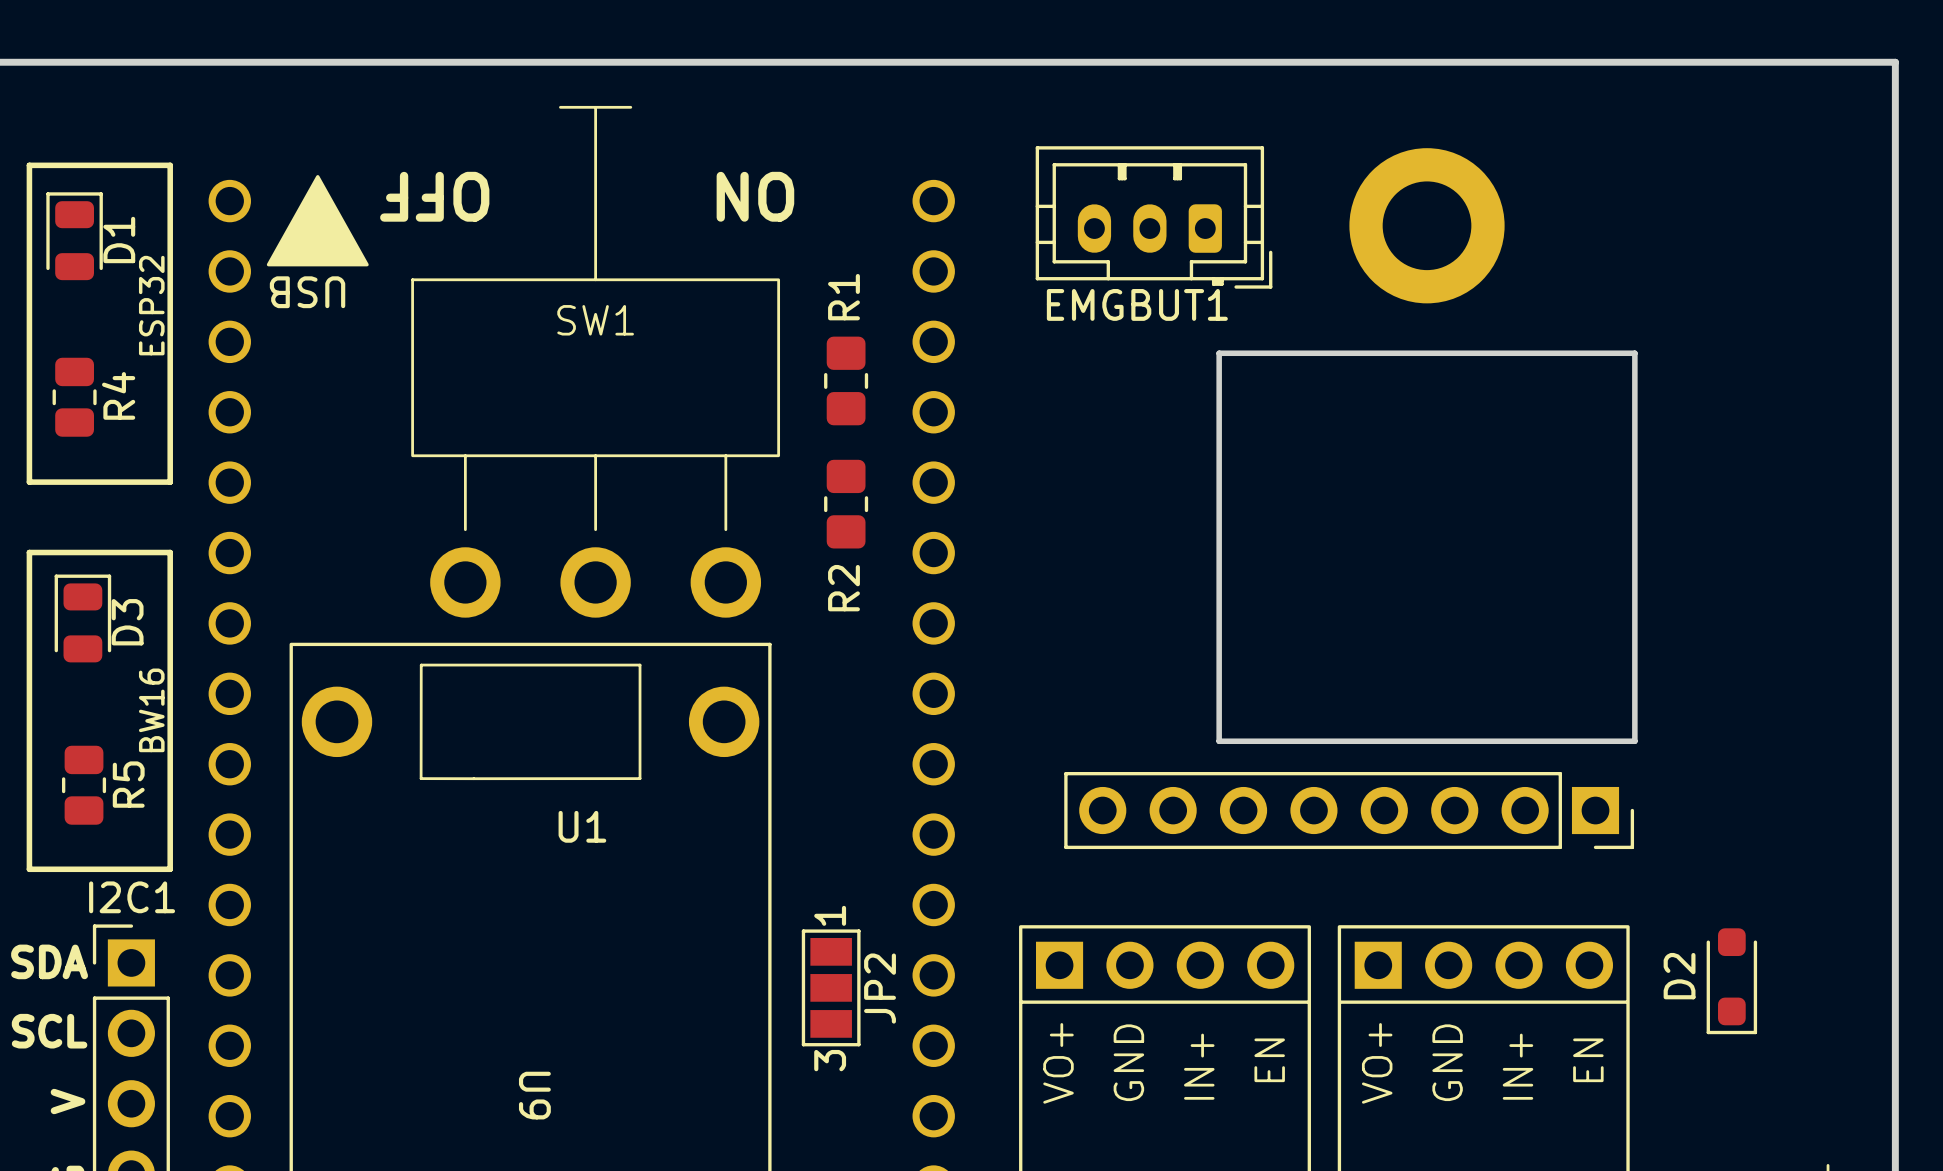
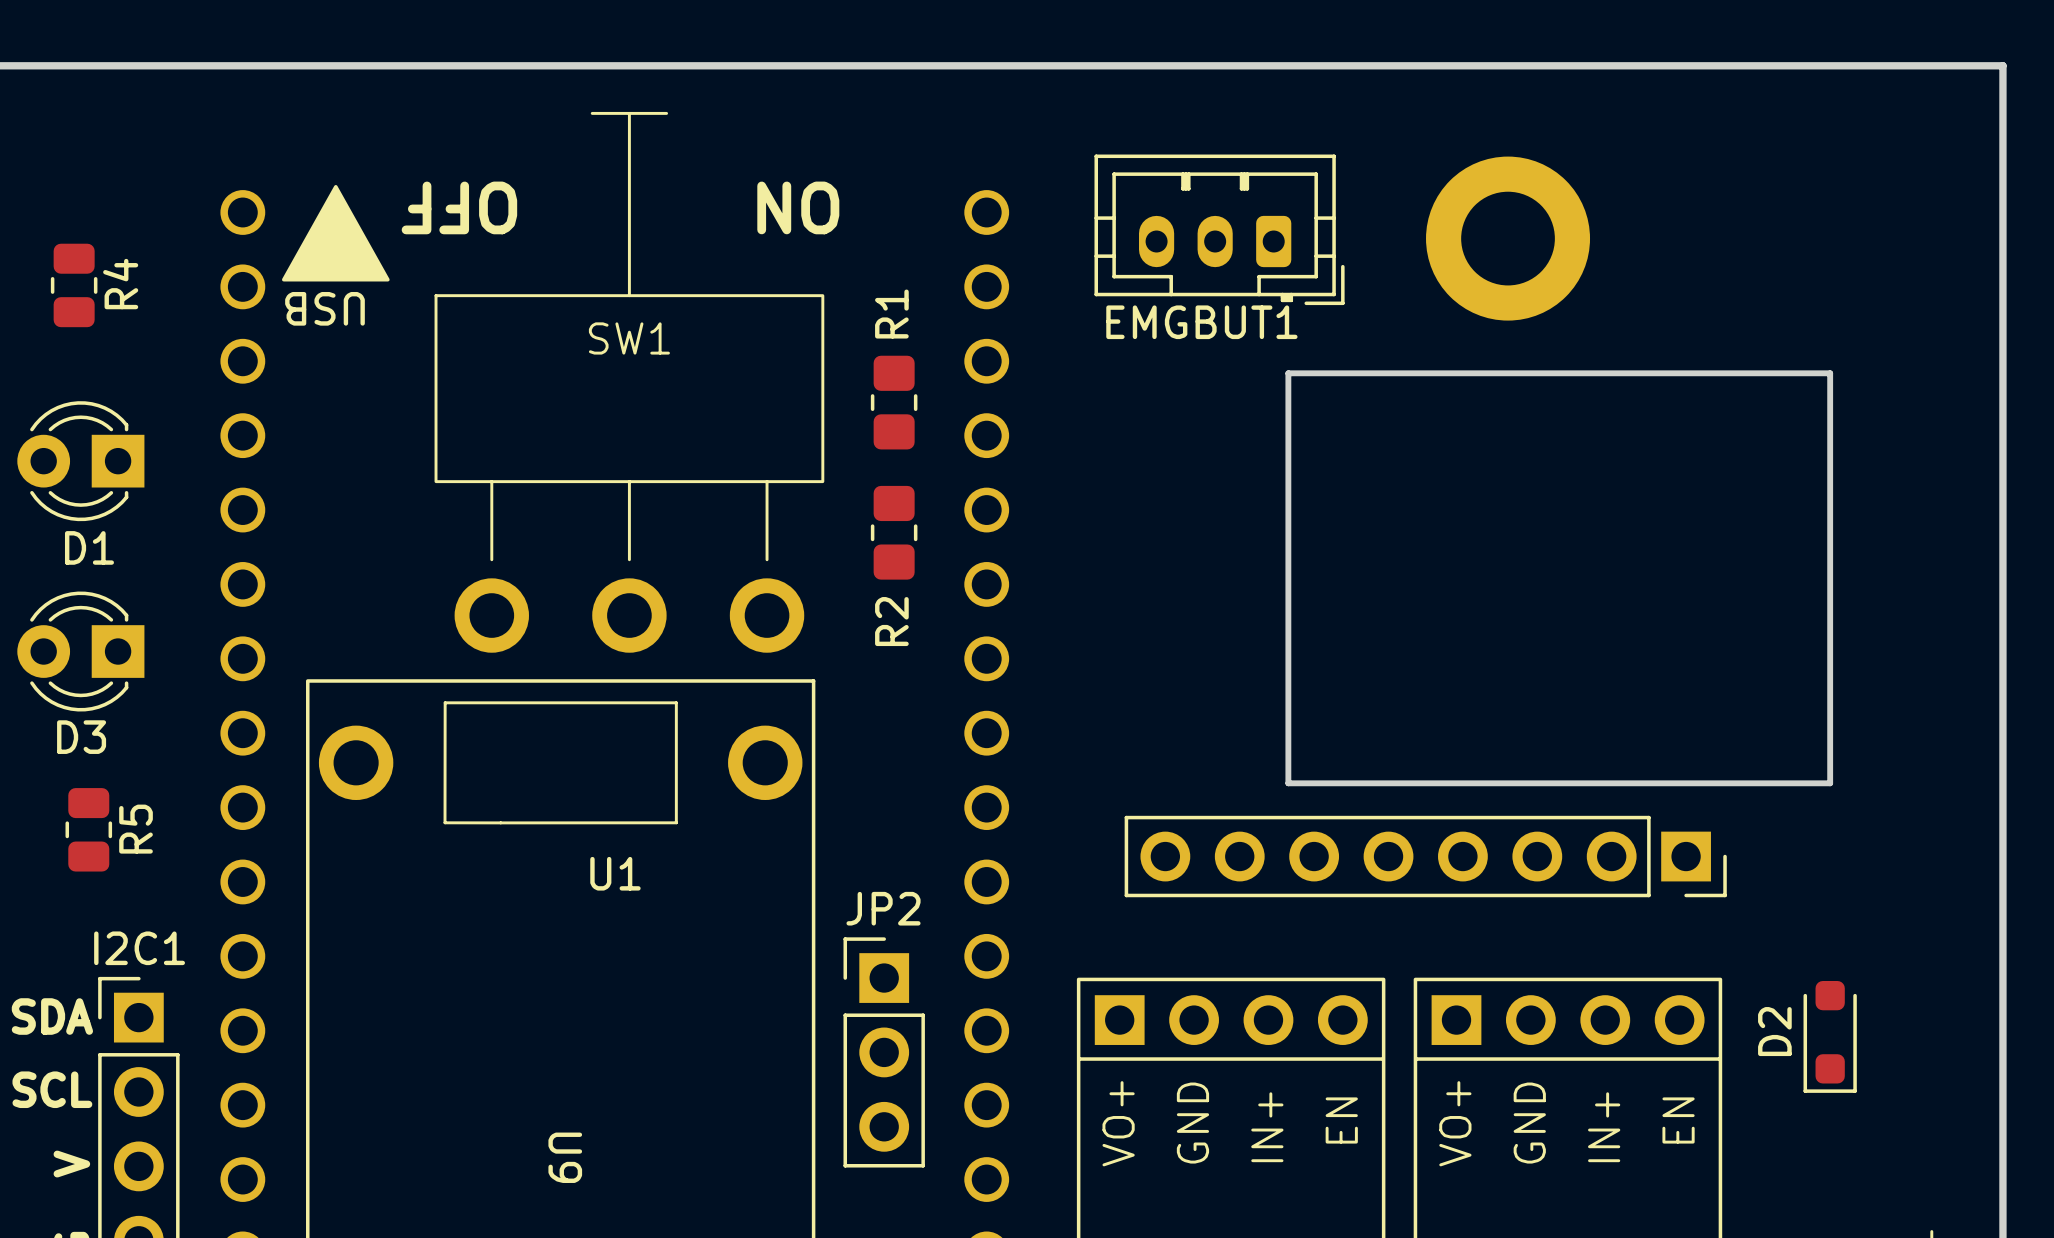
line: (29, 165) (170, 165) (170, 482) (29, 482) (29, 165) -> none
D1 footprint: [46, 192, 103, 281] -> [17, 401, 145, 522]
D1 name position: D1 (119, 240) -> D1 (89, 547)
text: ESP32 (151, 305) -> none
board edge: (1634, 353) (1634, 741) -> (1727, 373) (1830, 373) (1830, 783) (1727, 783)
R4 position: (74, 397) -> (74, 285)
line: (29, 552) (29, 869) (170, 869) (170, 552) (29, 552) -> none
D3 footprint: [54, 574, 112, 663] -> [17, 591, 145, 712]
D3 name position: D3 (127, 622) -> D3 (81, 737)
text: BW16 (151, 710) -> none
JP2 footprint: [801, 929, 861, 1047] -> [843, 937, 925, 1168]
JP2 name position: JP2 (880, 988) -> JP2 (883, 908)

